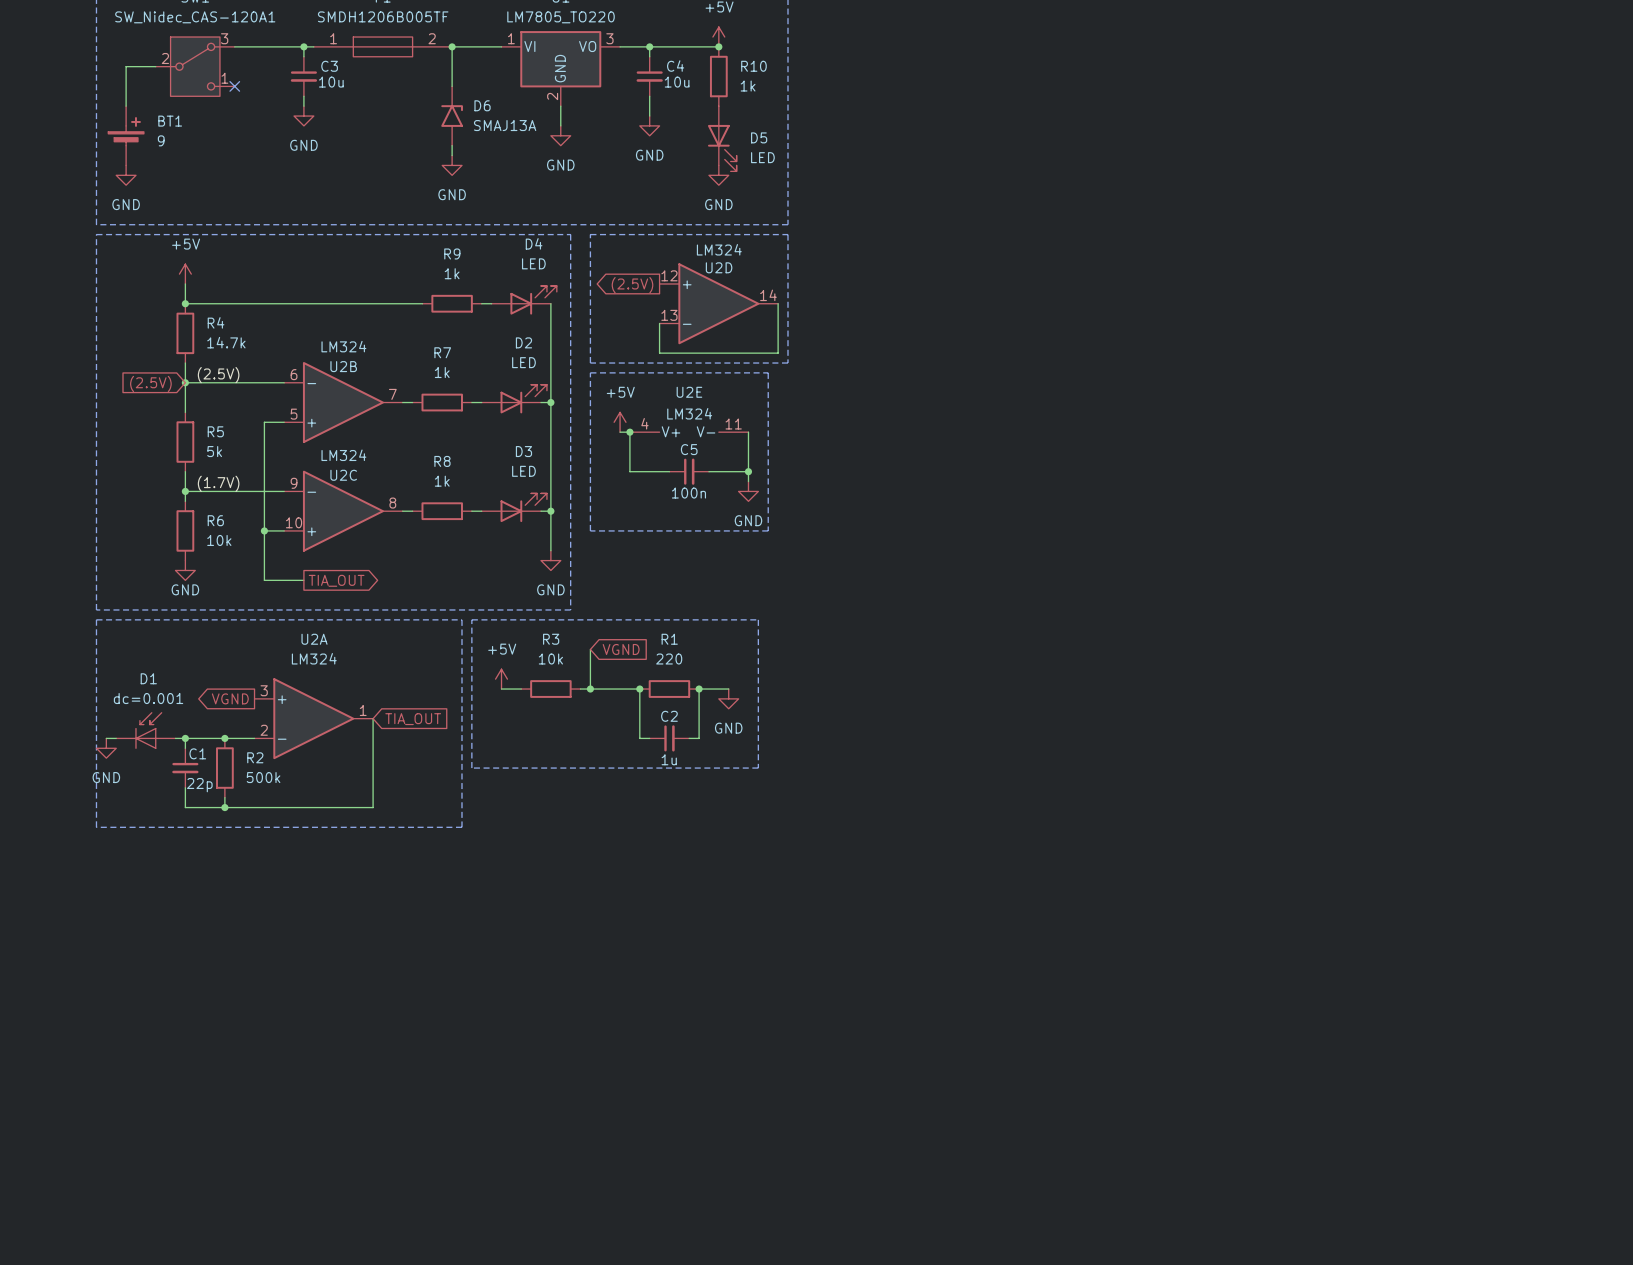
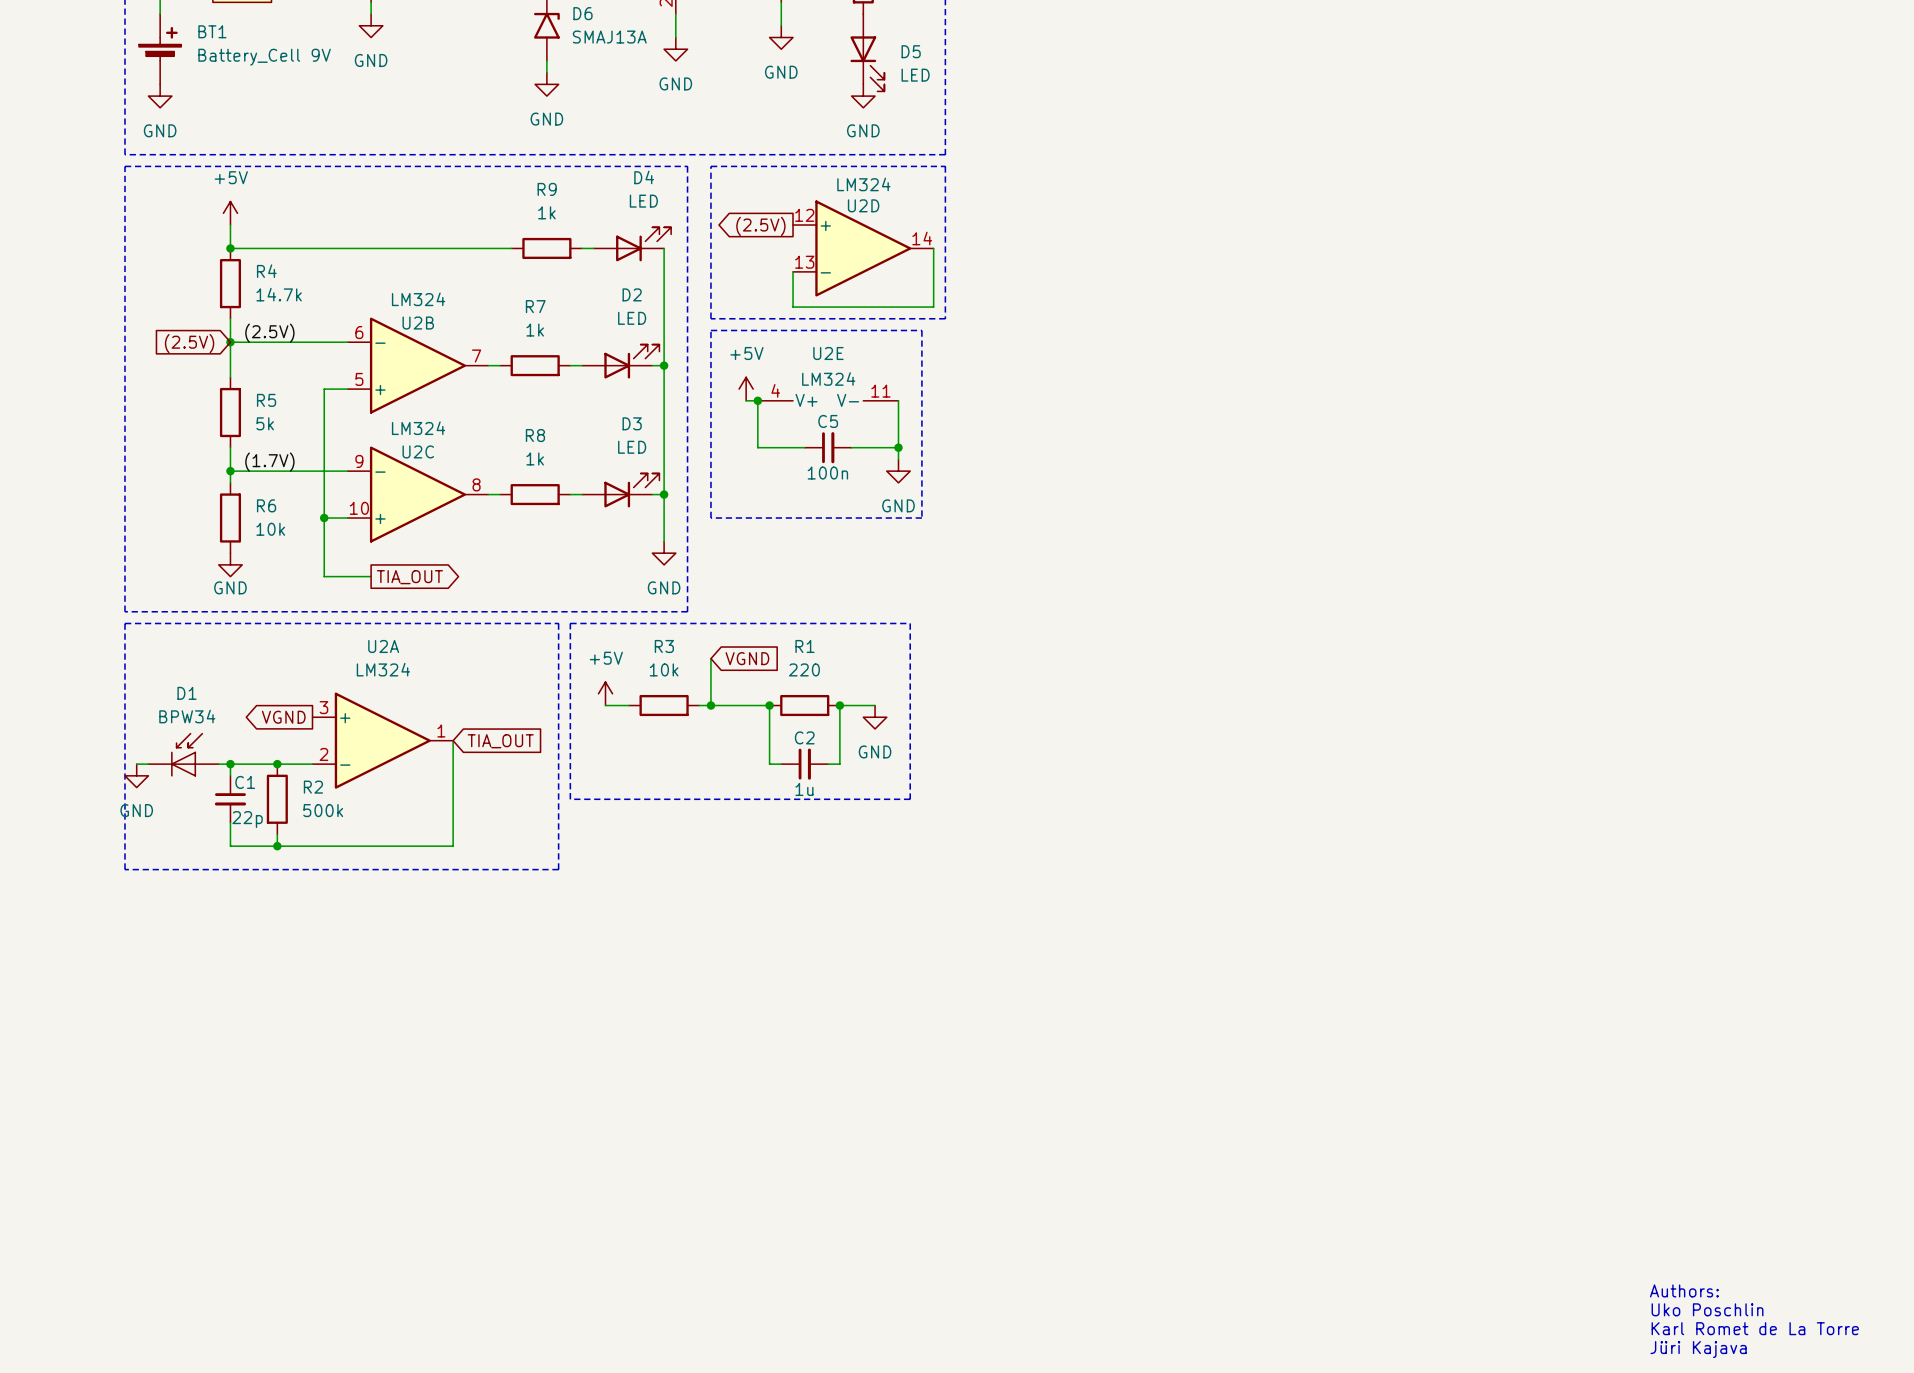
BT1 value: 9 (161, 140) -> Battery_Cell 9V (264, 57)
D1 value: dc=0.001 (148, 698) -> BPW34 (187, 716)
text: none -> Authors: (1684, 1290)
text: none -> Uko Poschlin (1707, 1309)
text: none -> Karl Romet de La Torre (1755, 1328)
text: none -> Jüri Kajava (1698, 1349)

